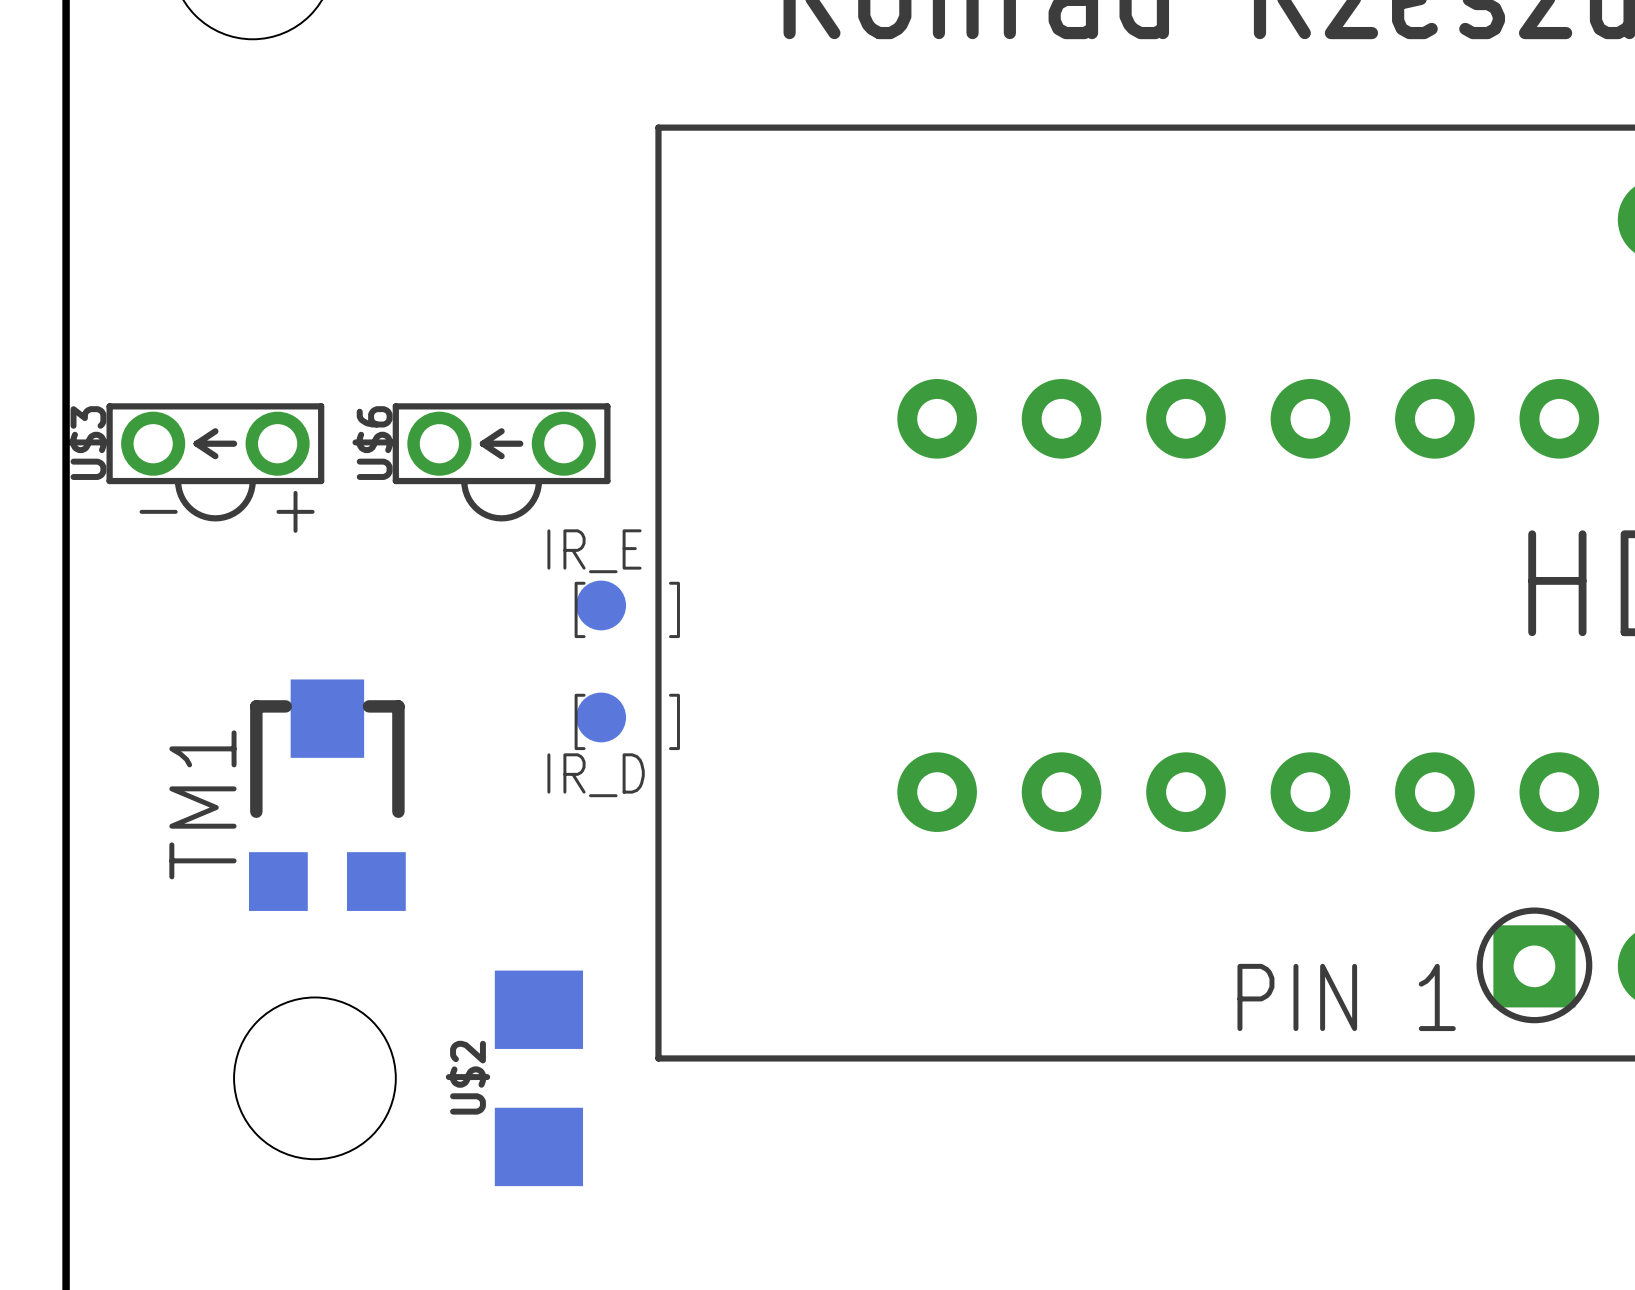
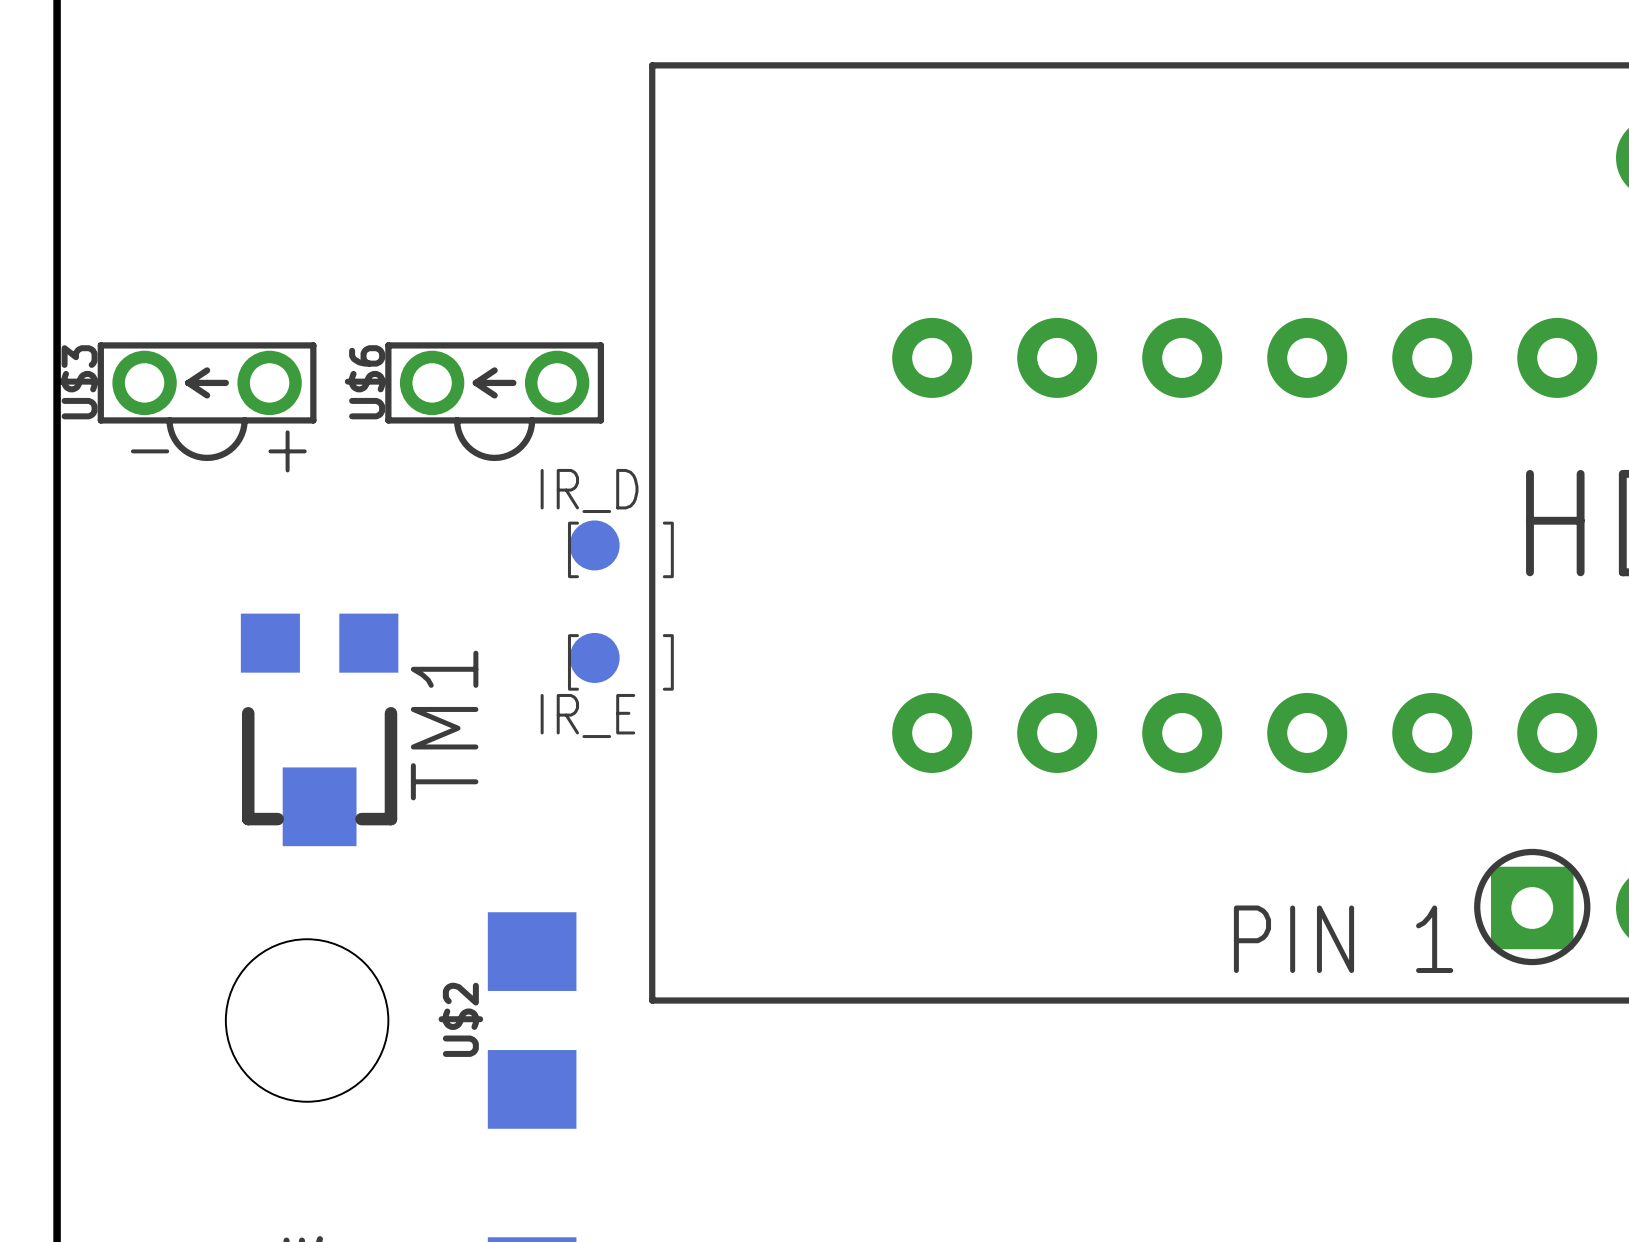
text: IR_E (594, 551) -> IR_D (589, 490)
text: IR_D (596, 775) -> IR_E (587, 716)
TM1 rotation: 0° (327, 795) -> 180° (319, 729)

